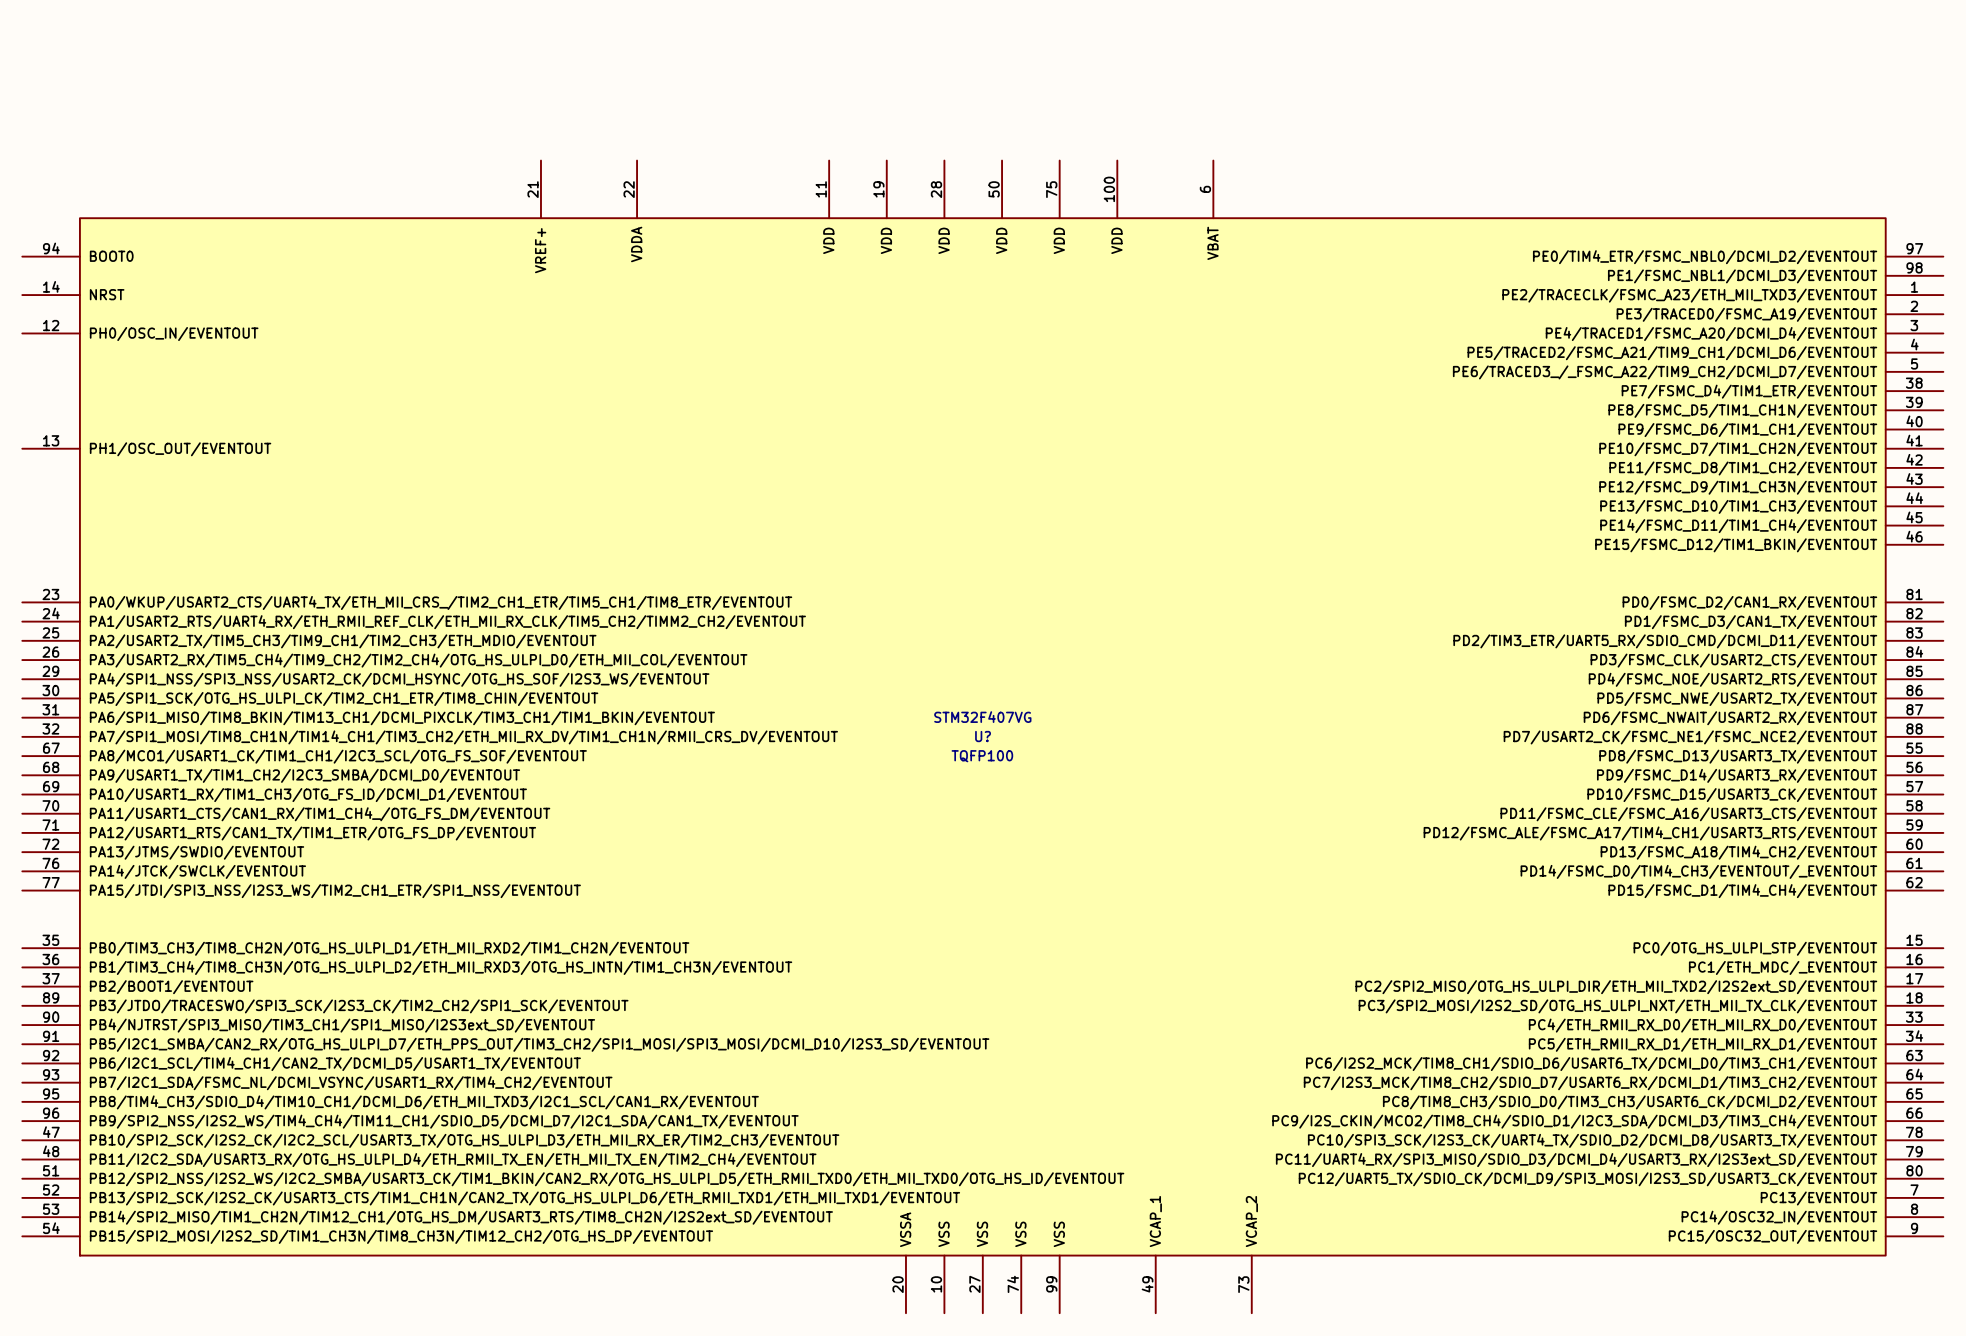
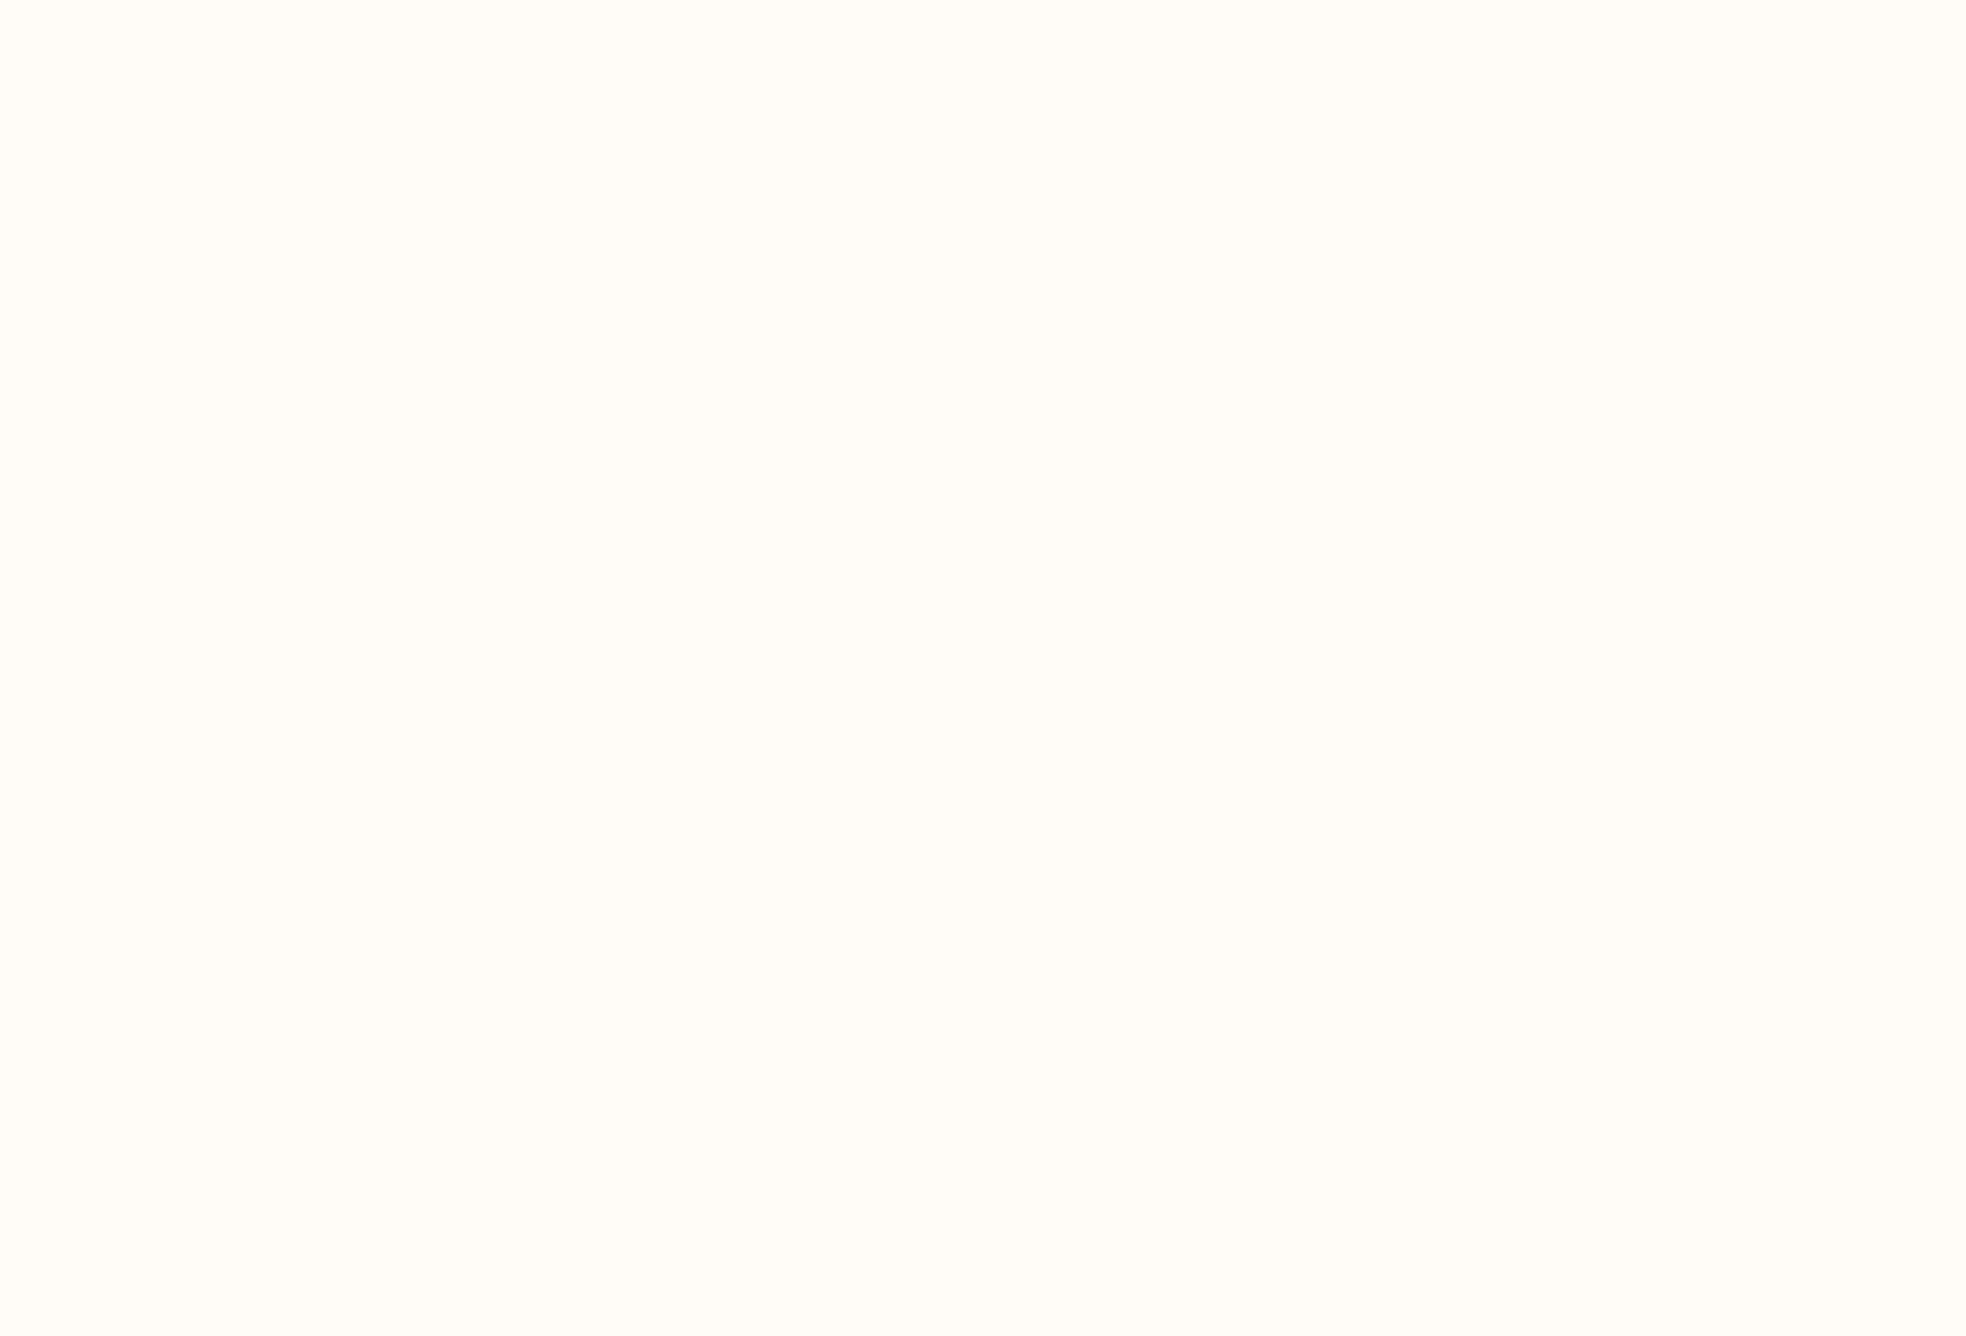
U?: STM32F407VG (982, 736) -> none

